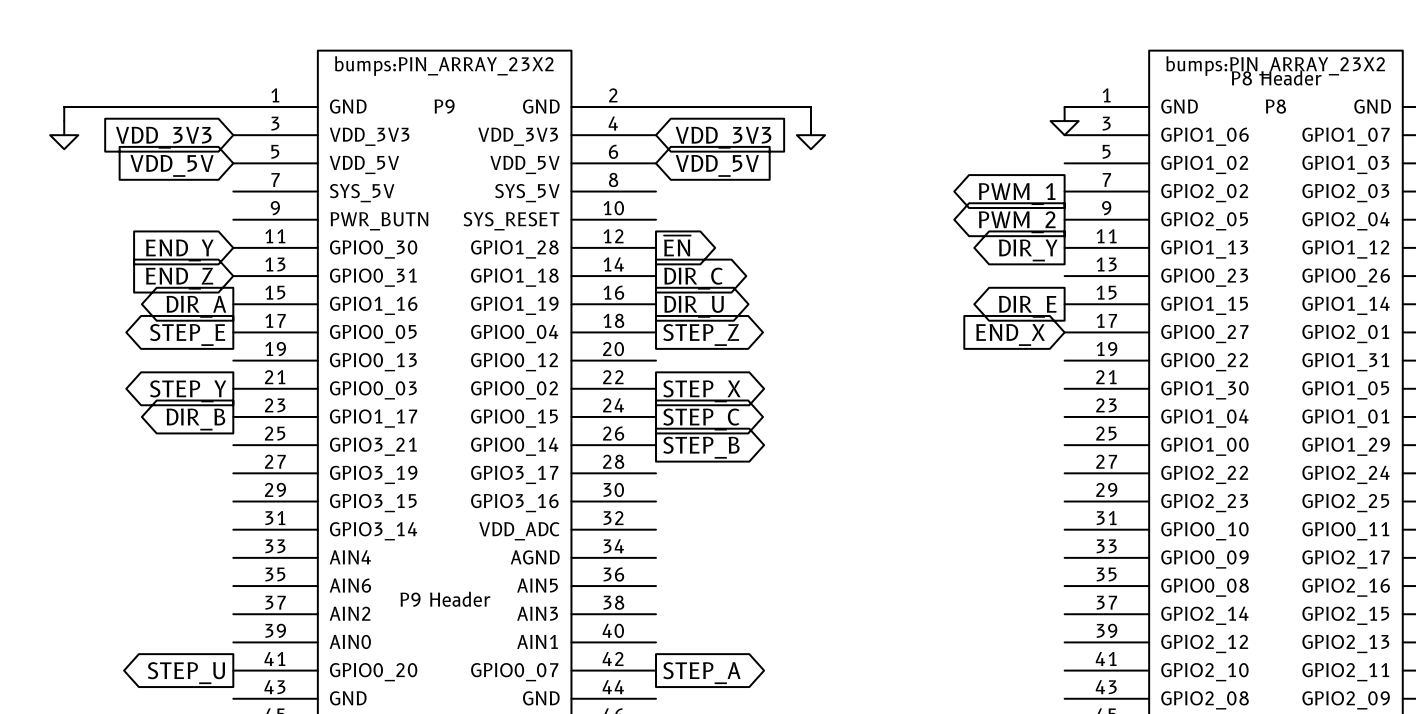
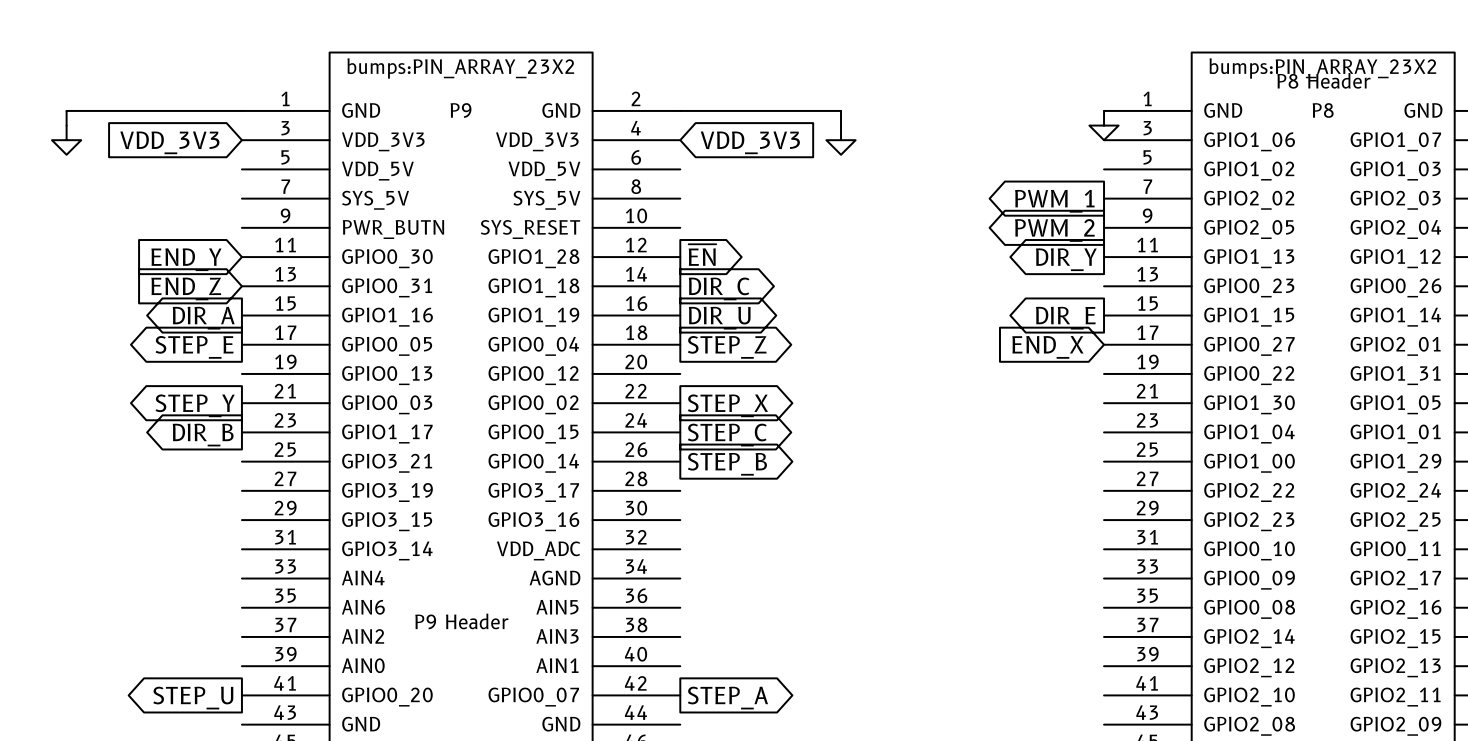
global label: VDD_5V (172, 165) -> none
global label: VDD_5V (717, 165) -> none

